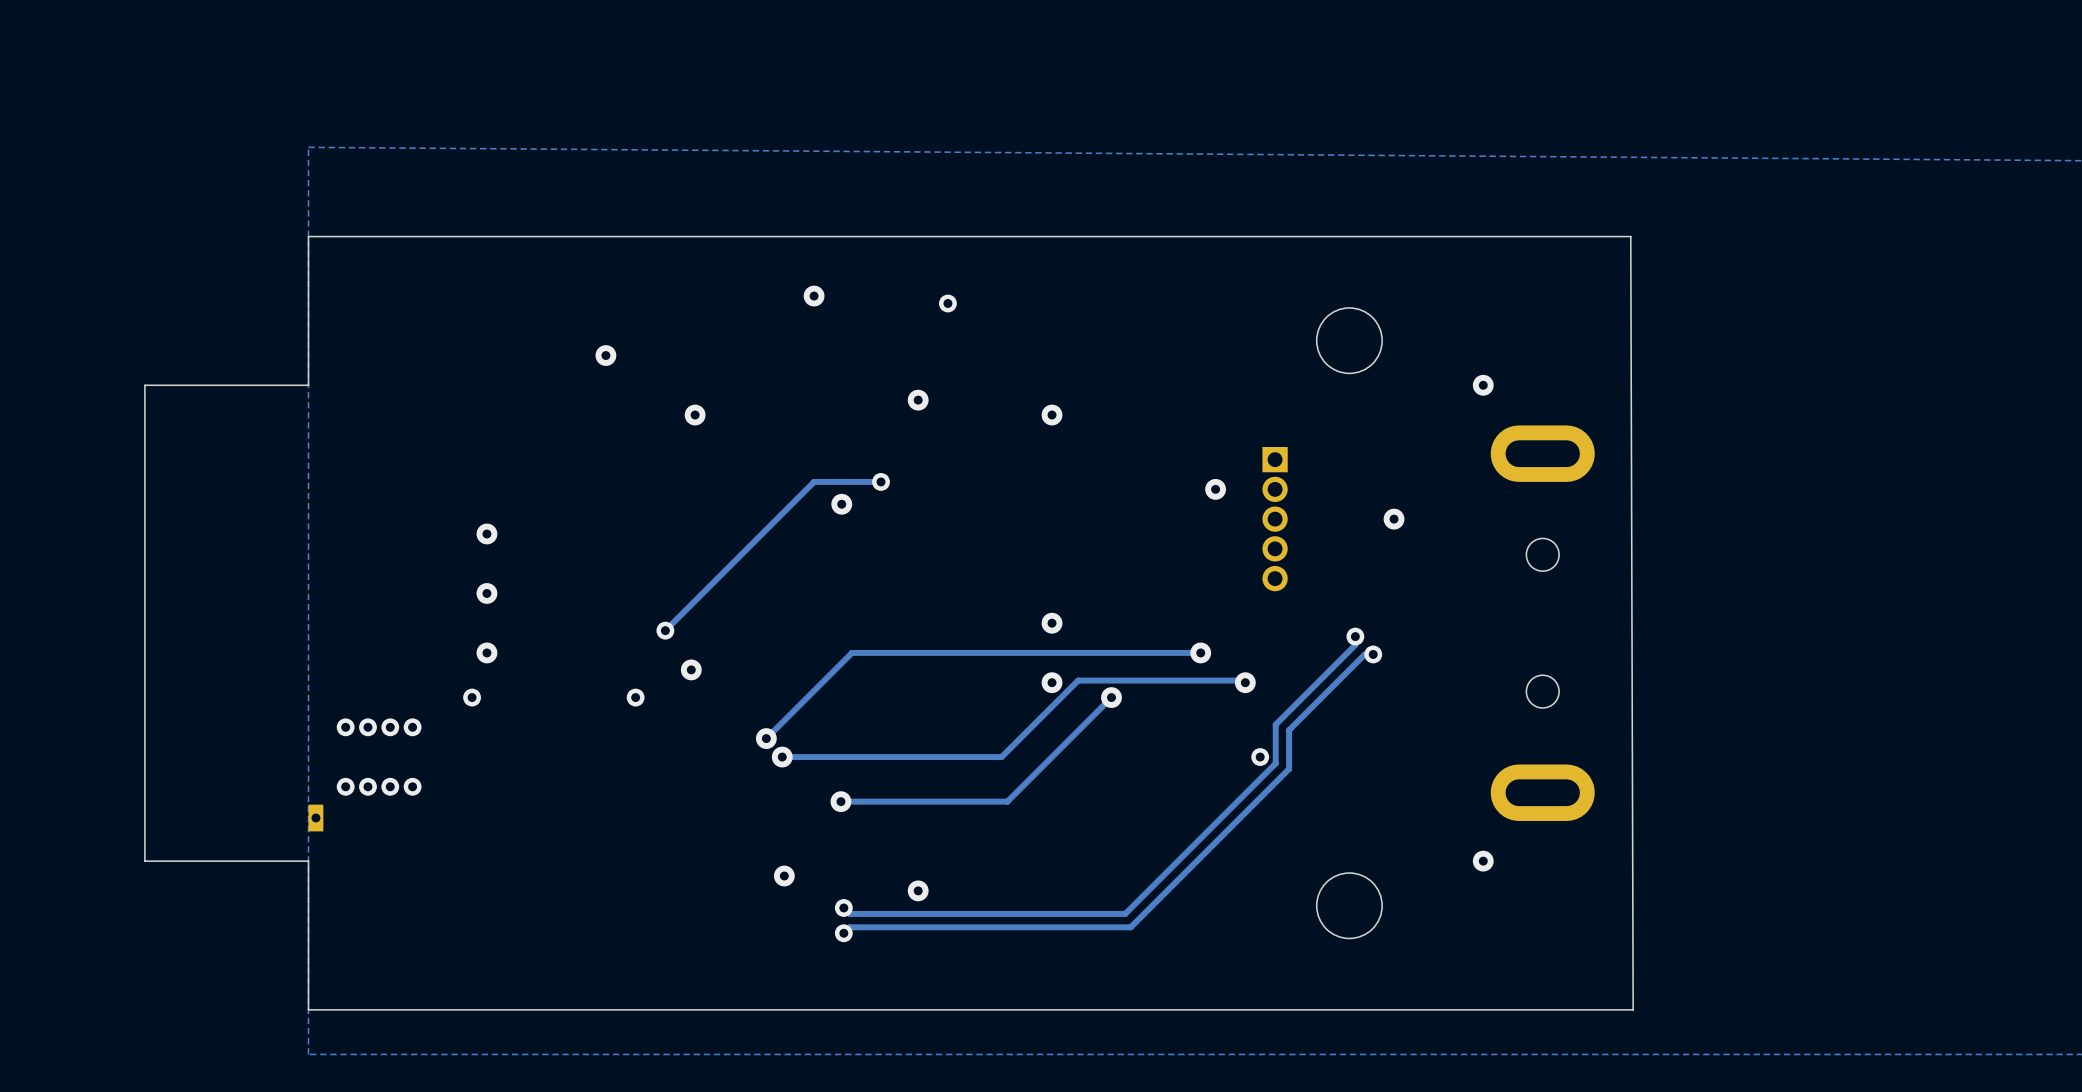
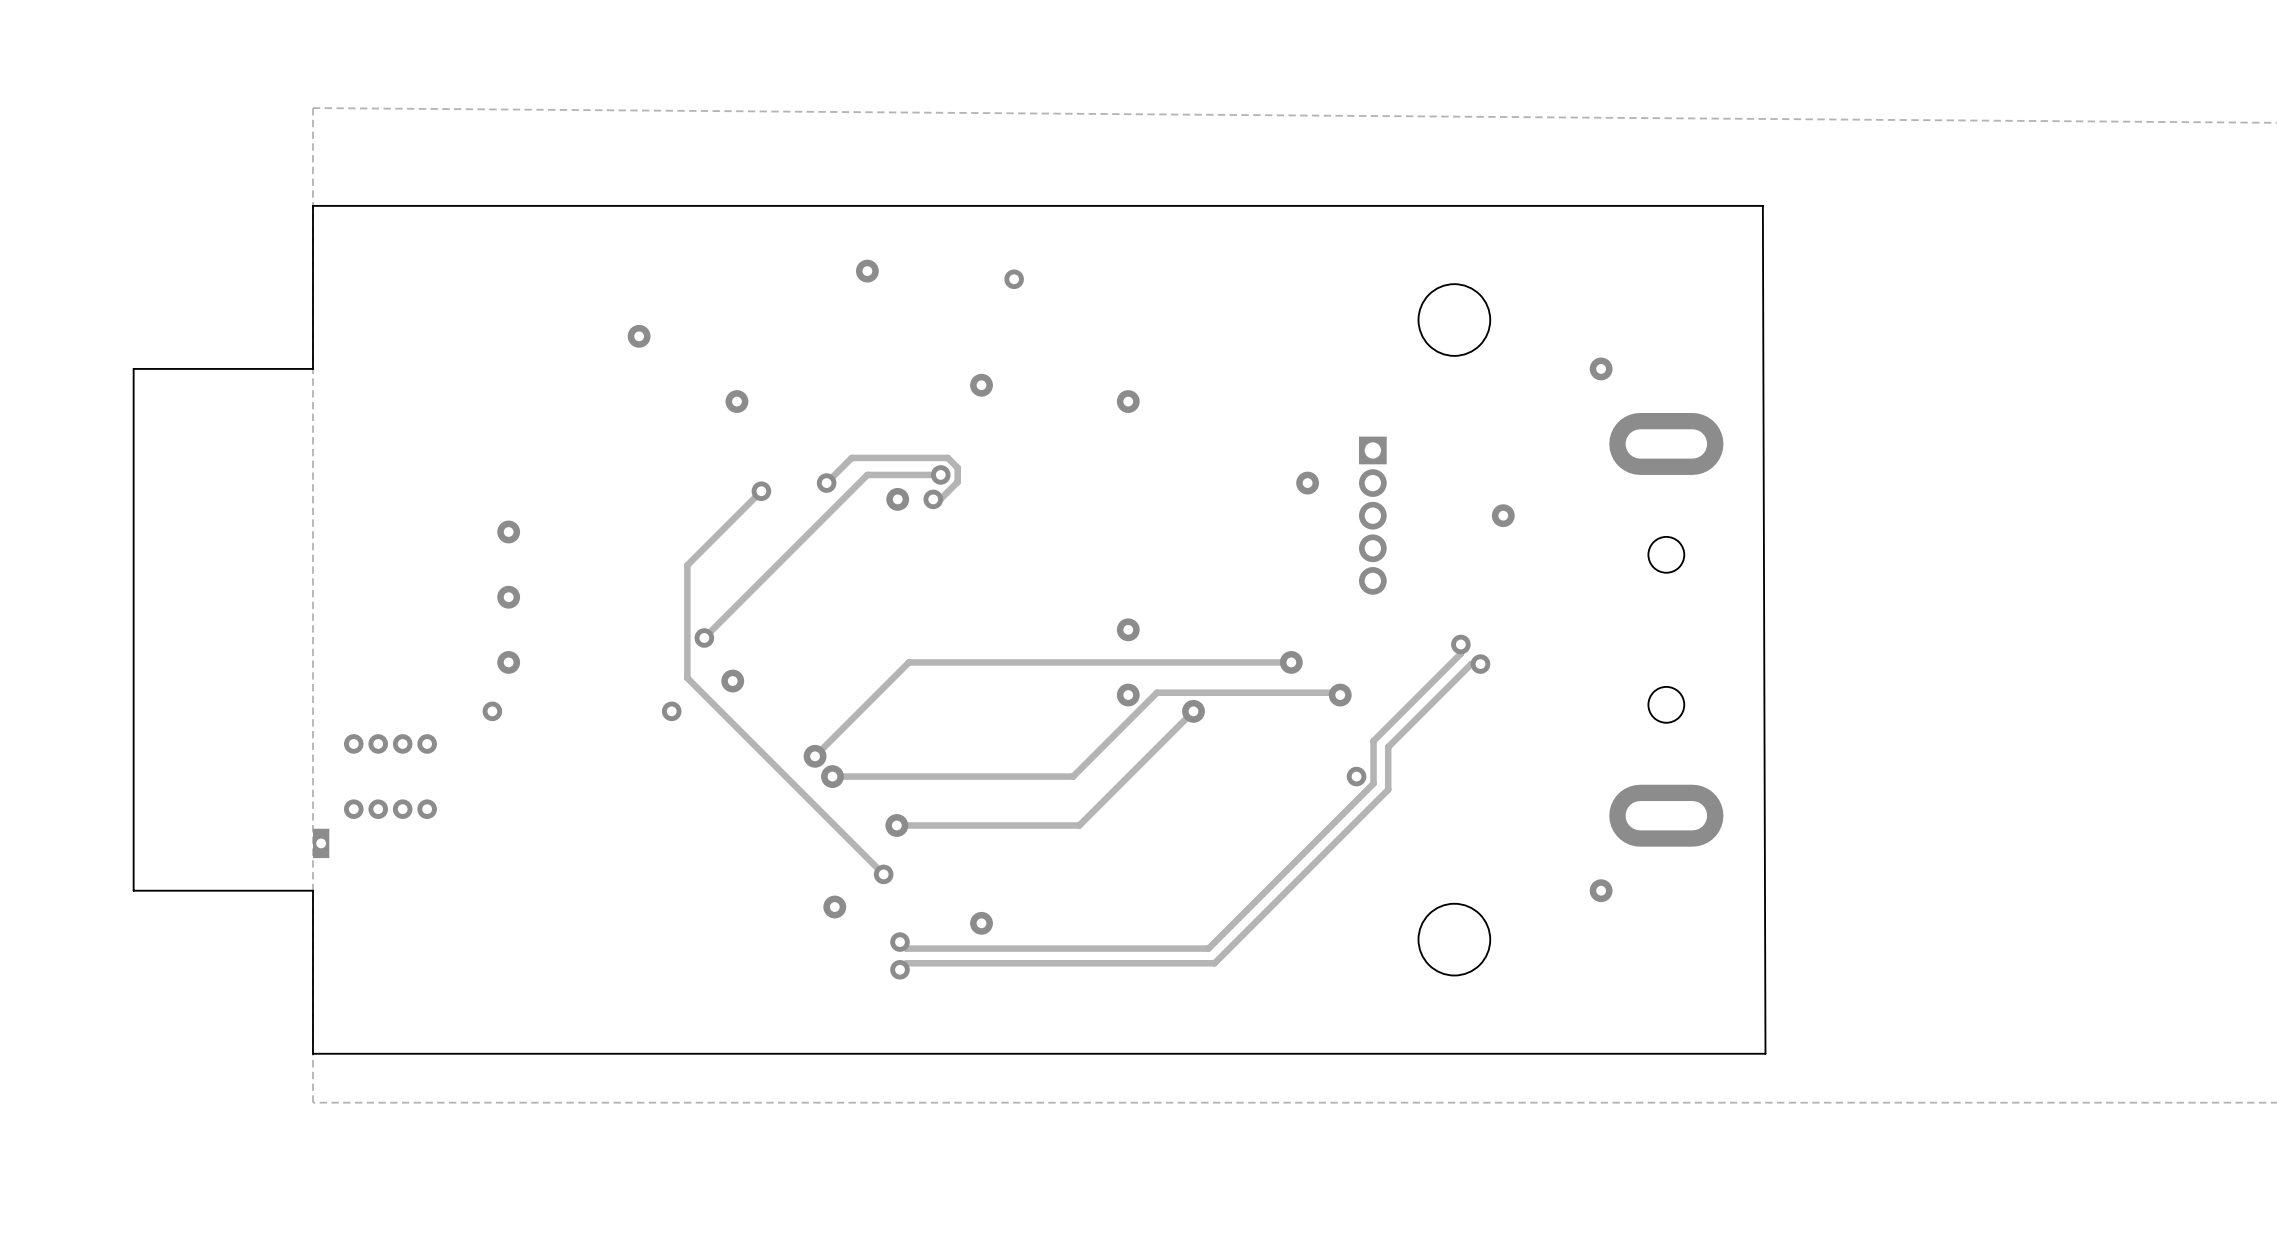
track: none -> (826, 483) (851, 457) (947, 457) (957, 467) (957, 481) (940, 499) (933, 499)
via: none -> (826, 483)
track: none -> (761, 491) (687, 565) (687, 678) (883, 874)
via: none -> (761, 491)
via: none -> (933, 499)
via: none -> (883, 874)

